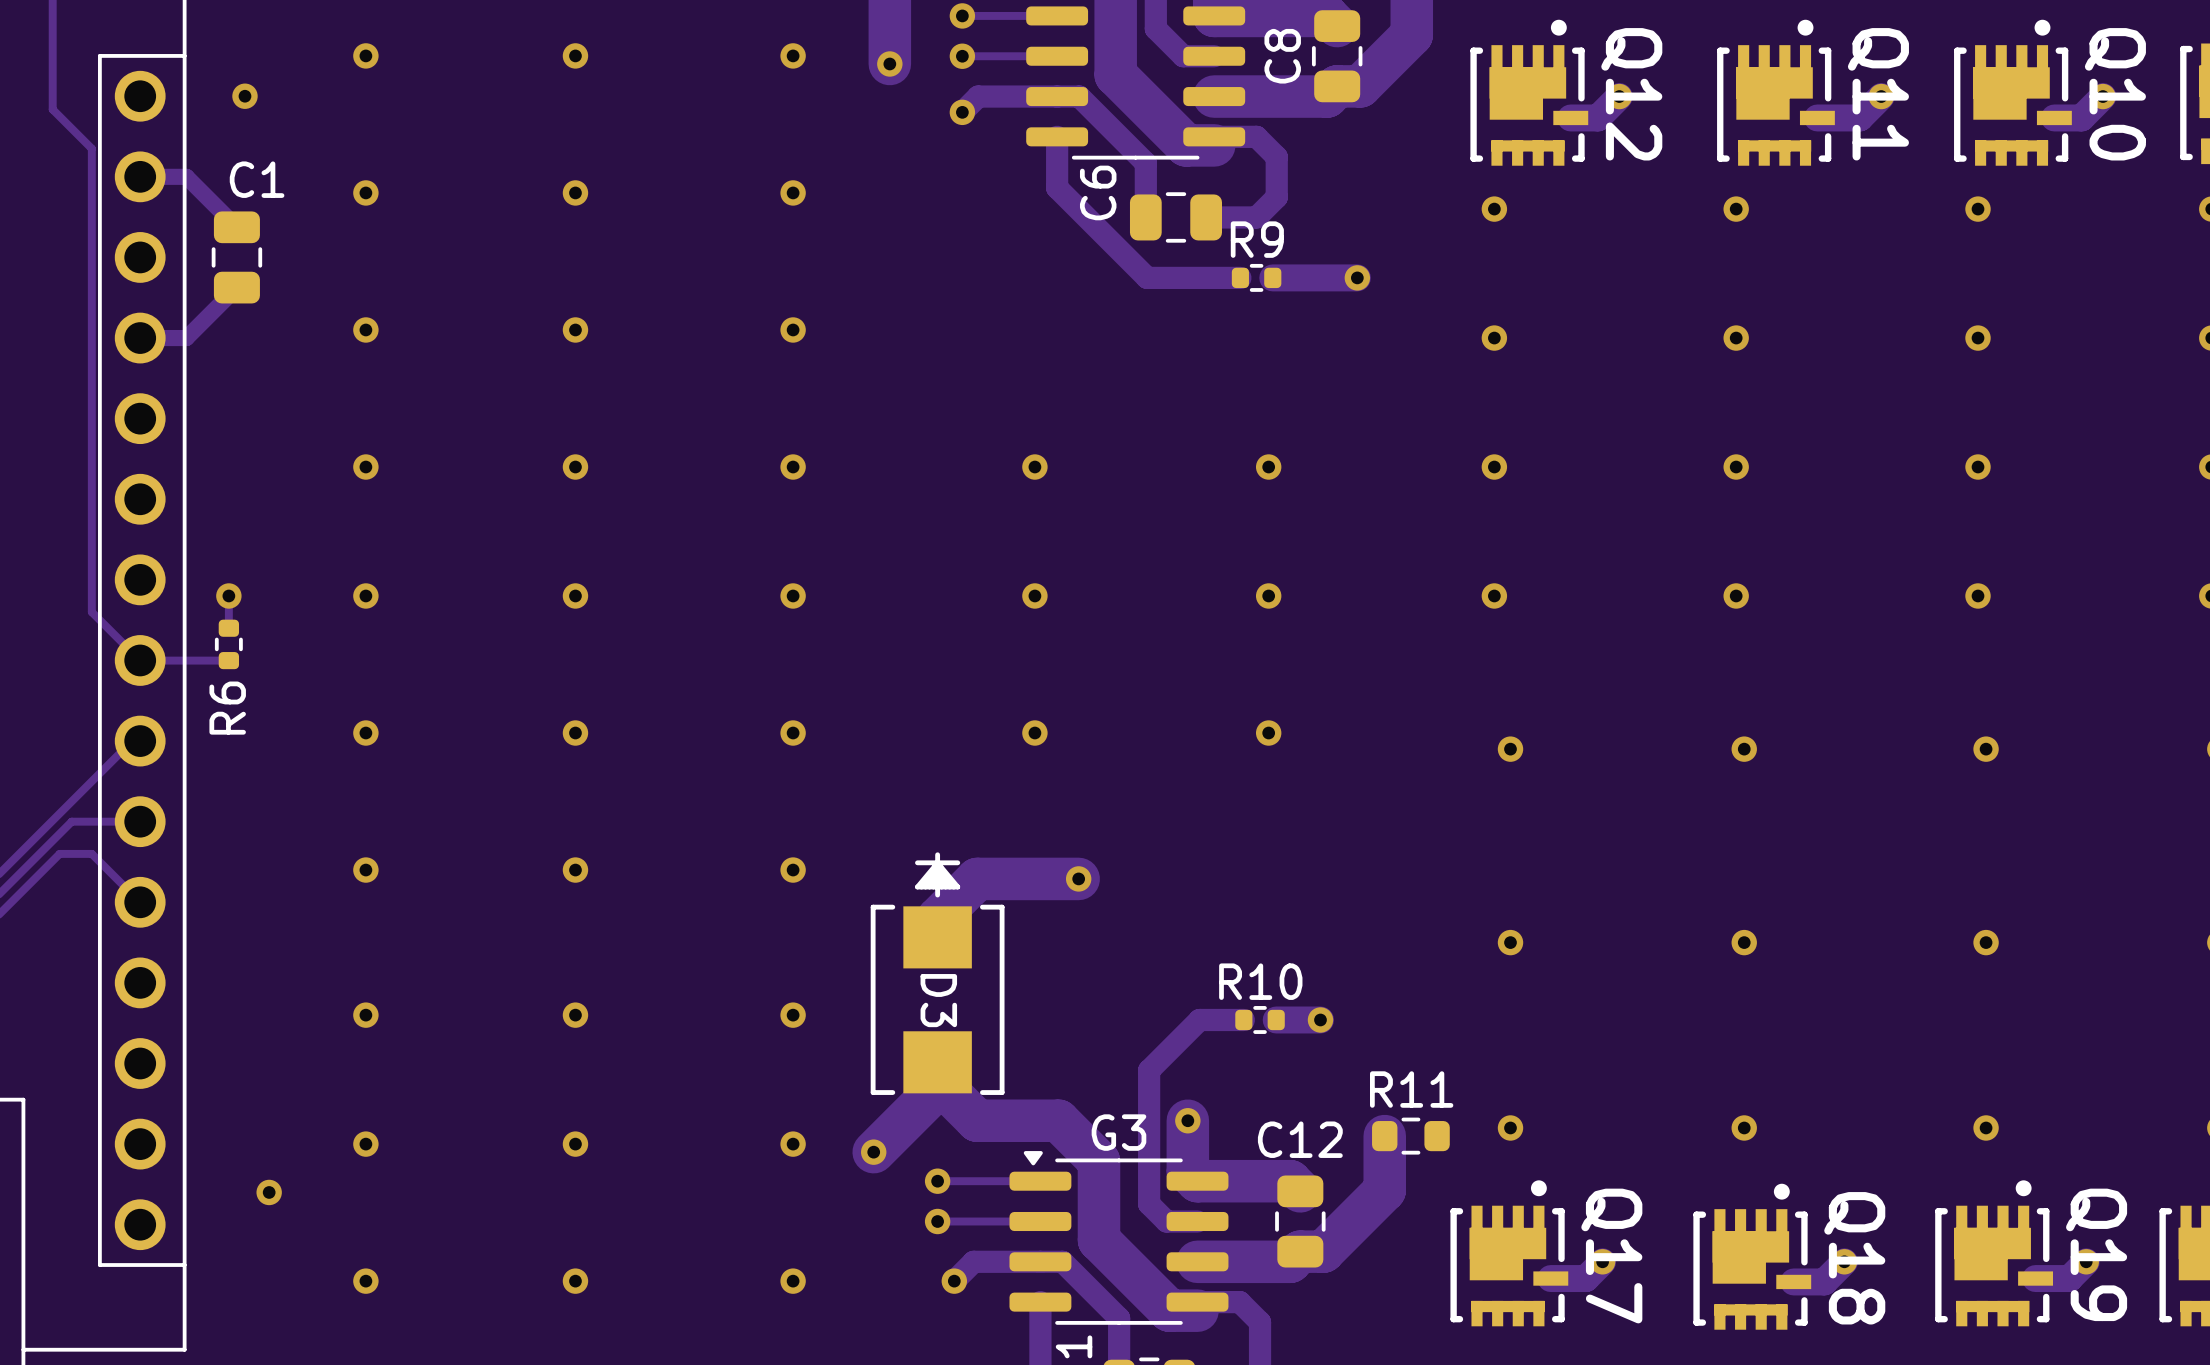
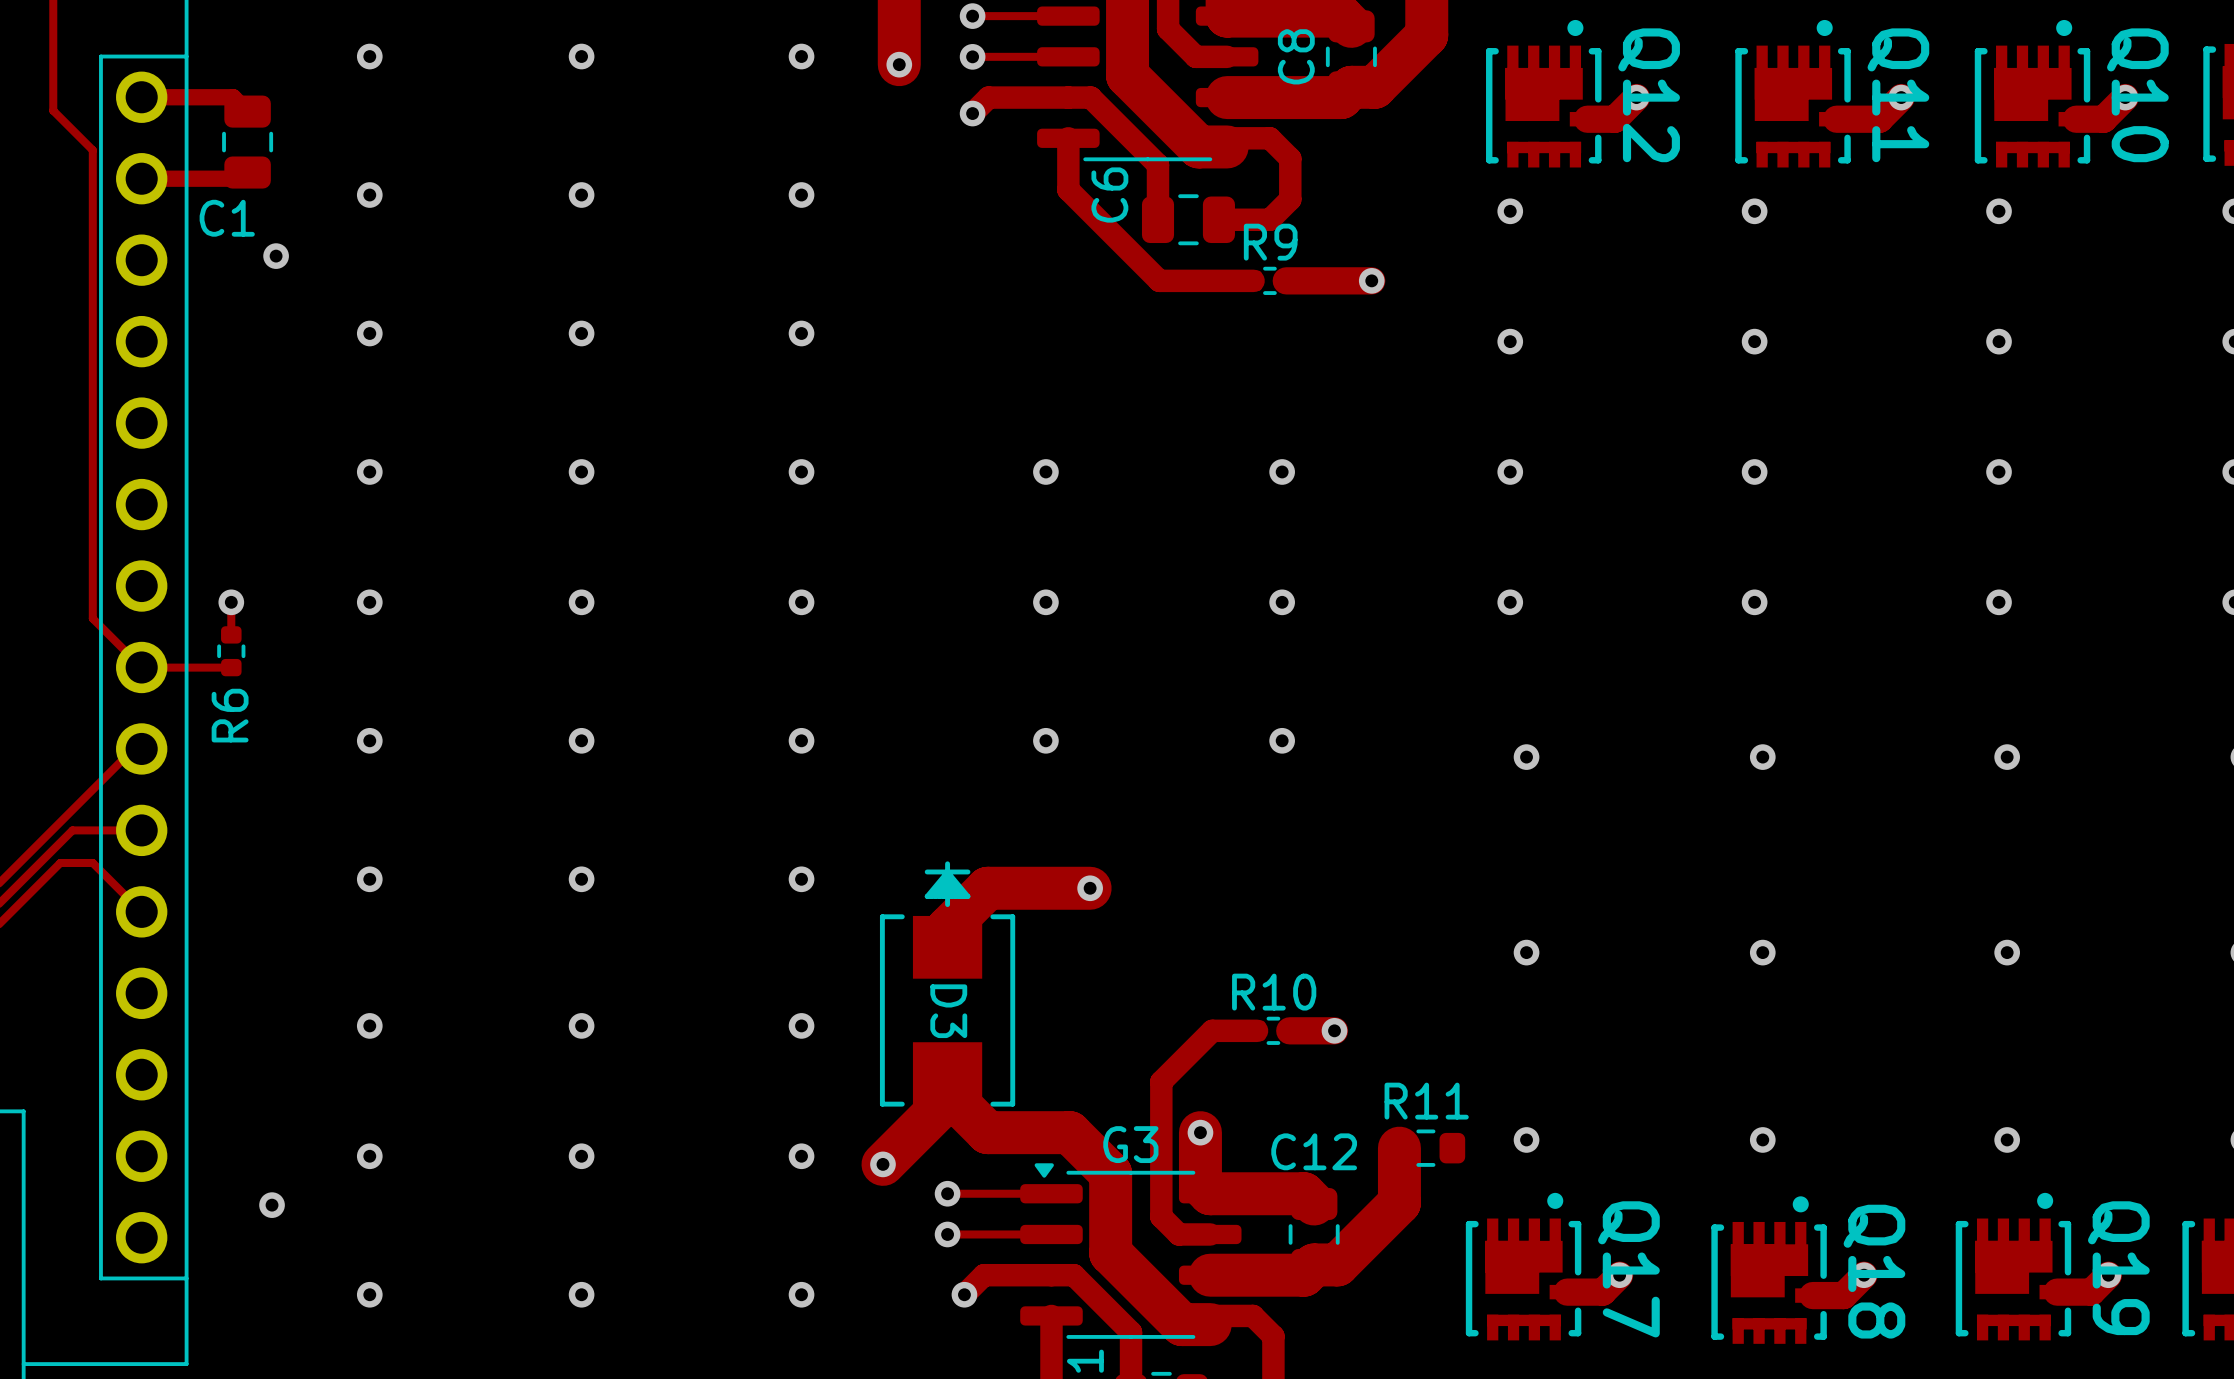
track: none -> (141, 97) (233, 97) (247, 111)
via position: (244, 96) -> (276, 256)
track: (186, 176) (236, 227) -> (188, 178) (241, 178) (247, 172)
C1 name position: C1 (257, 179) -> C1 (227, 218)
C1 position: (236, 257) -> (247, 142)
track: (236, 287) (186, 338) (140, 338) -> none

